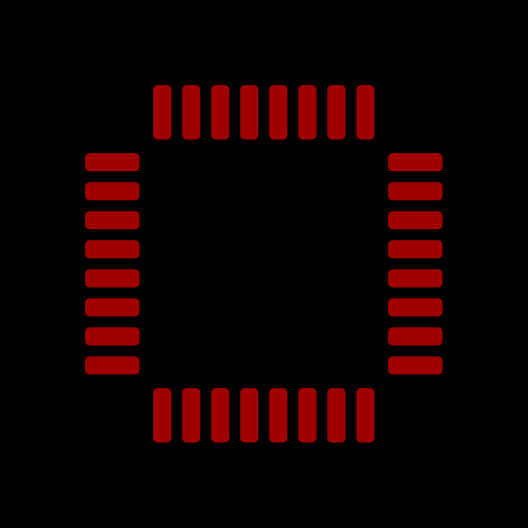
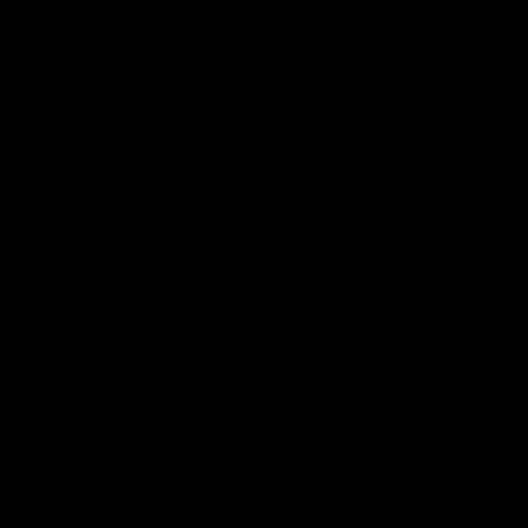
part: (263, 263) -> none

